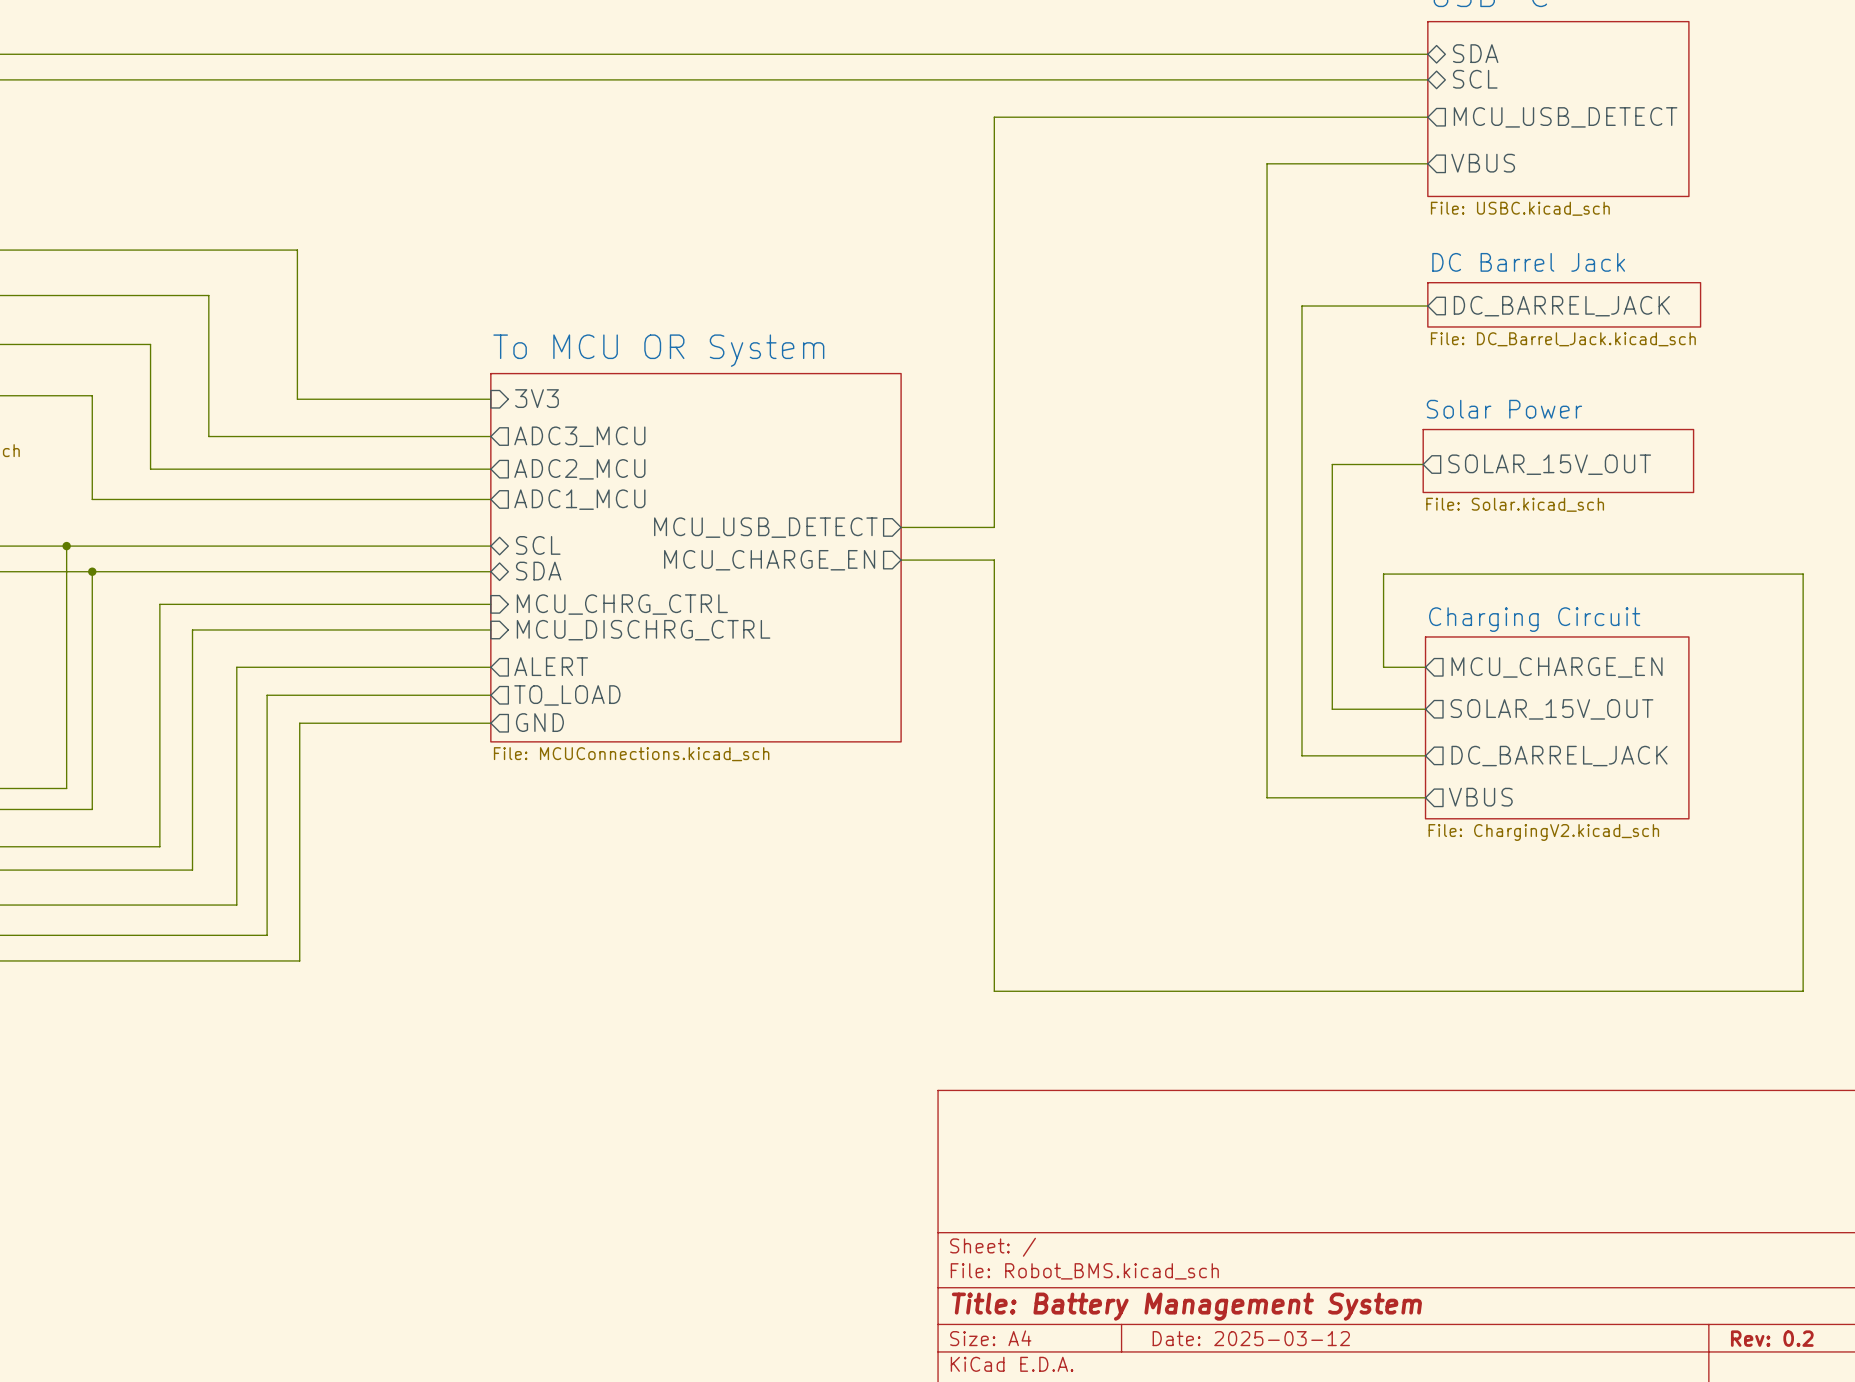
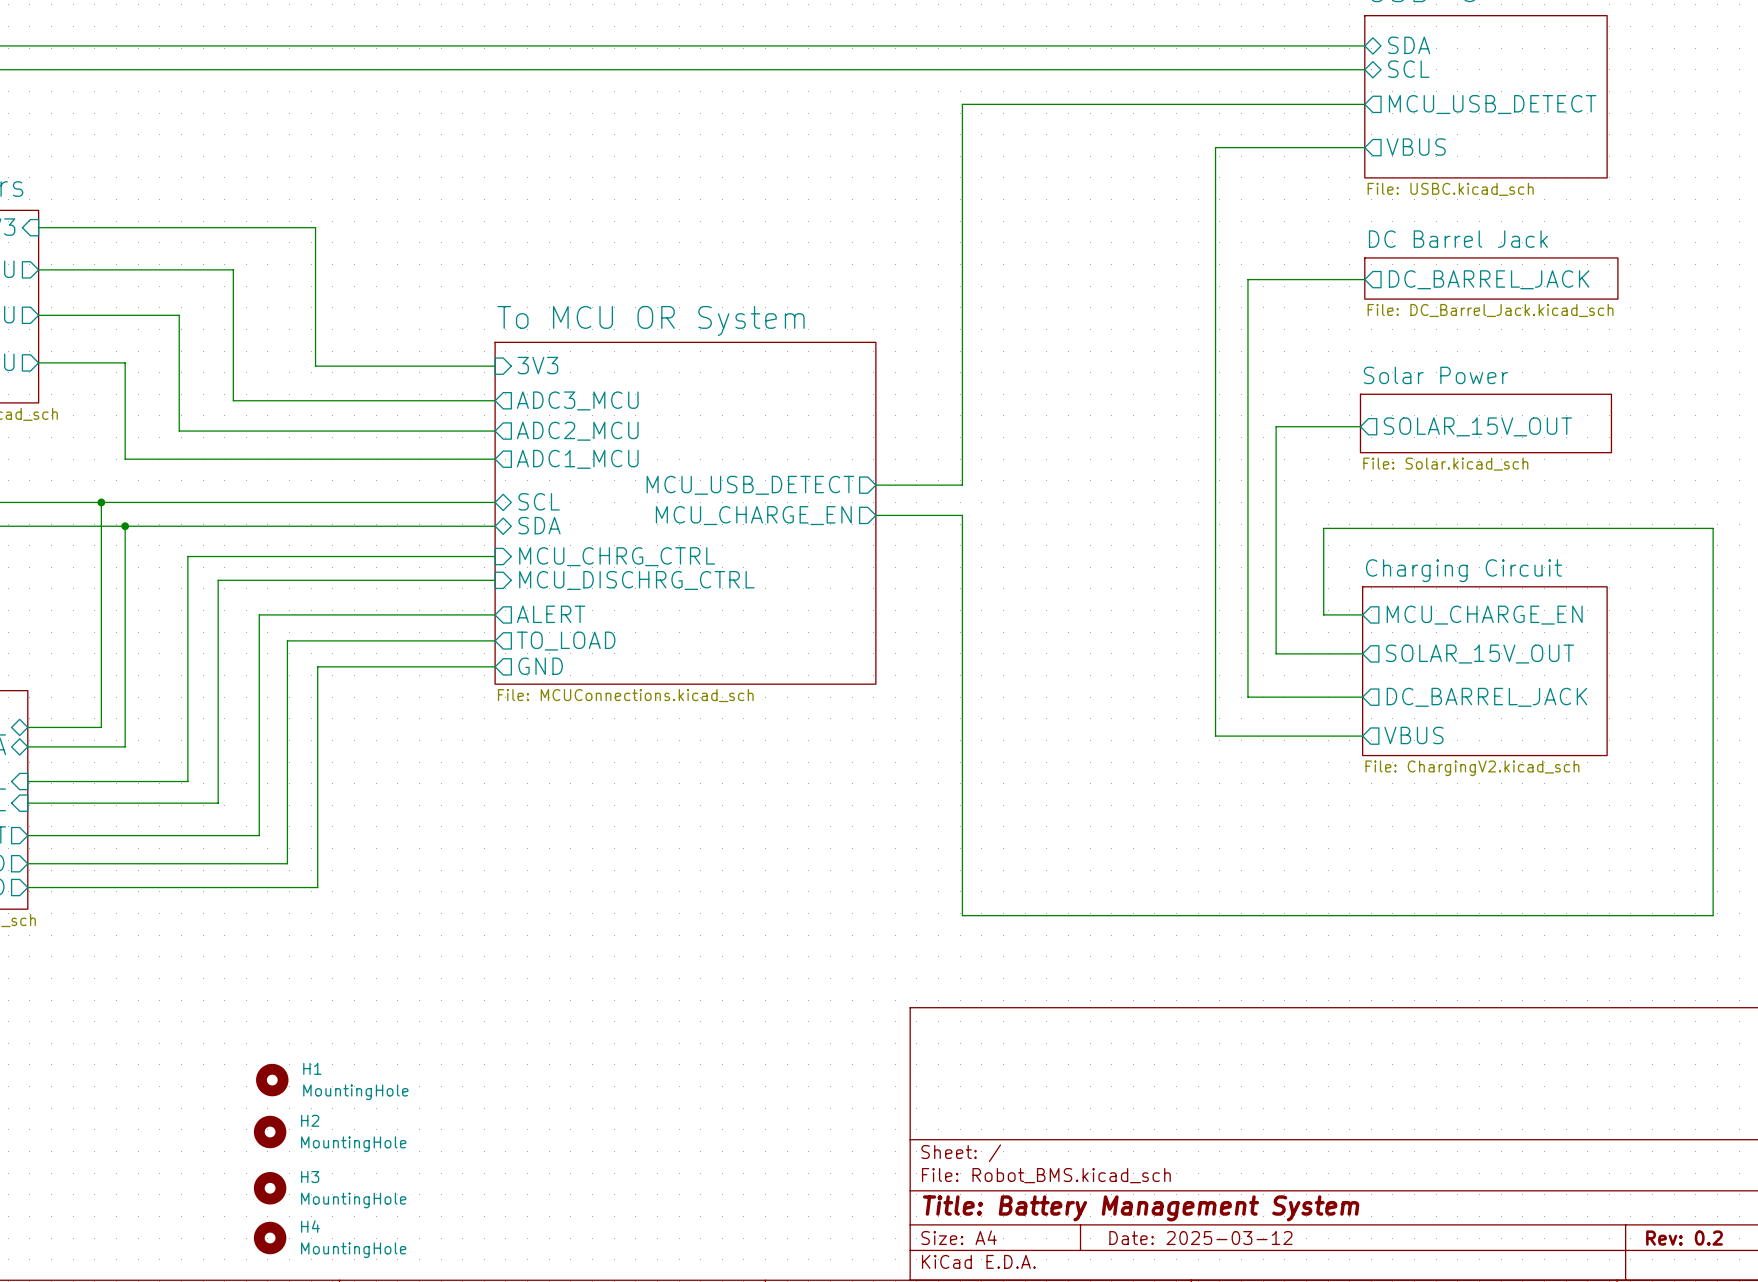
H1: none -> MountingHole (272, 1080)
H2: none -> MountingHole (270, 1132)
H3: none -> MountingHole (270, 1188)
H4: none -> MountingHole (270, 1238)

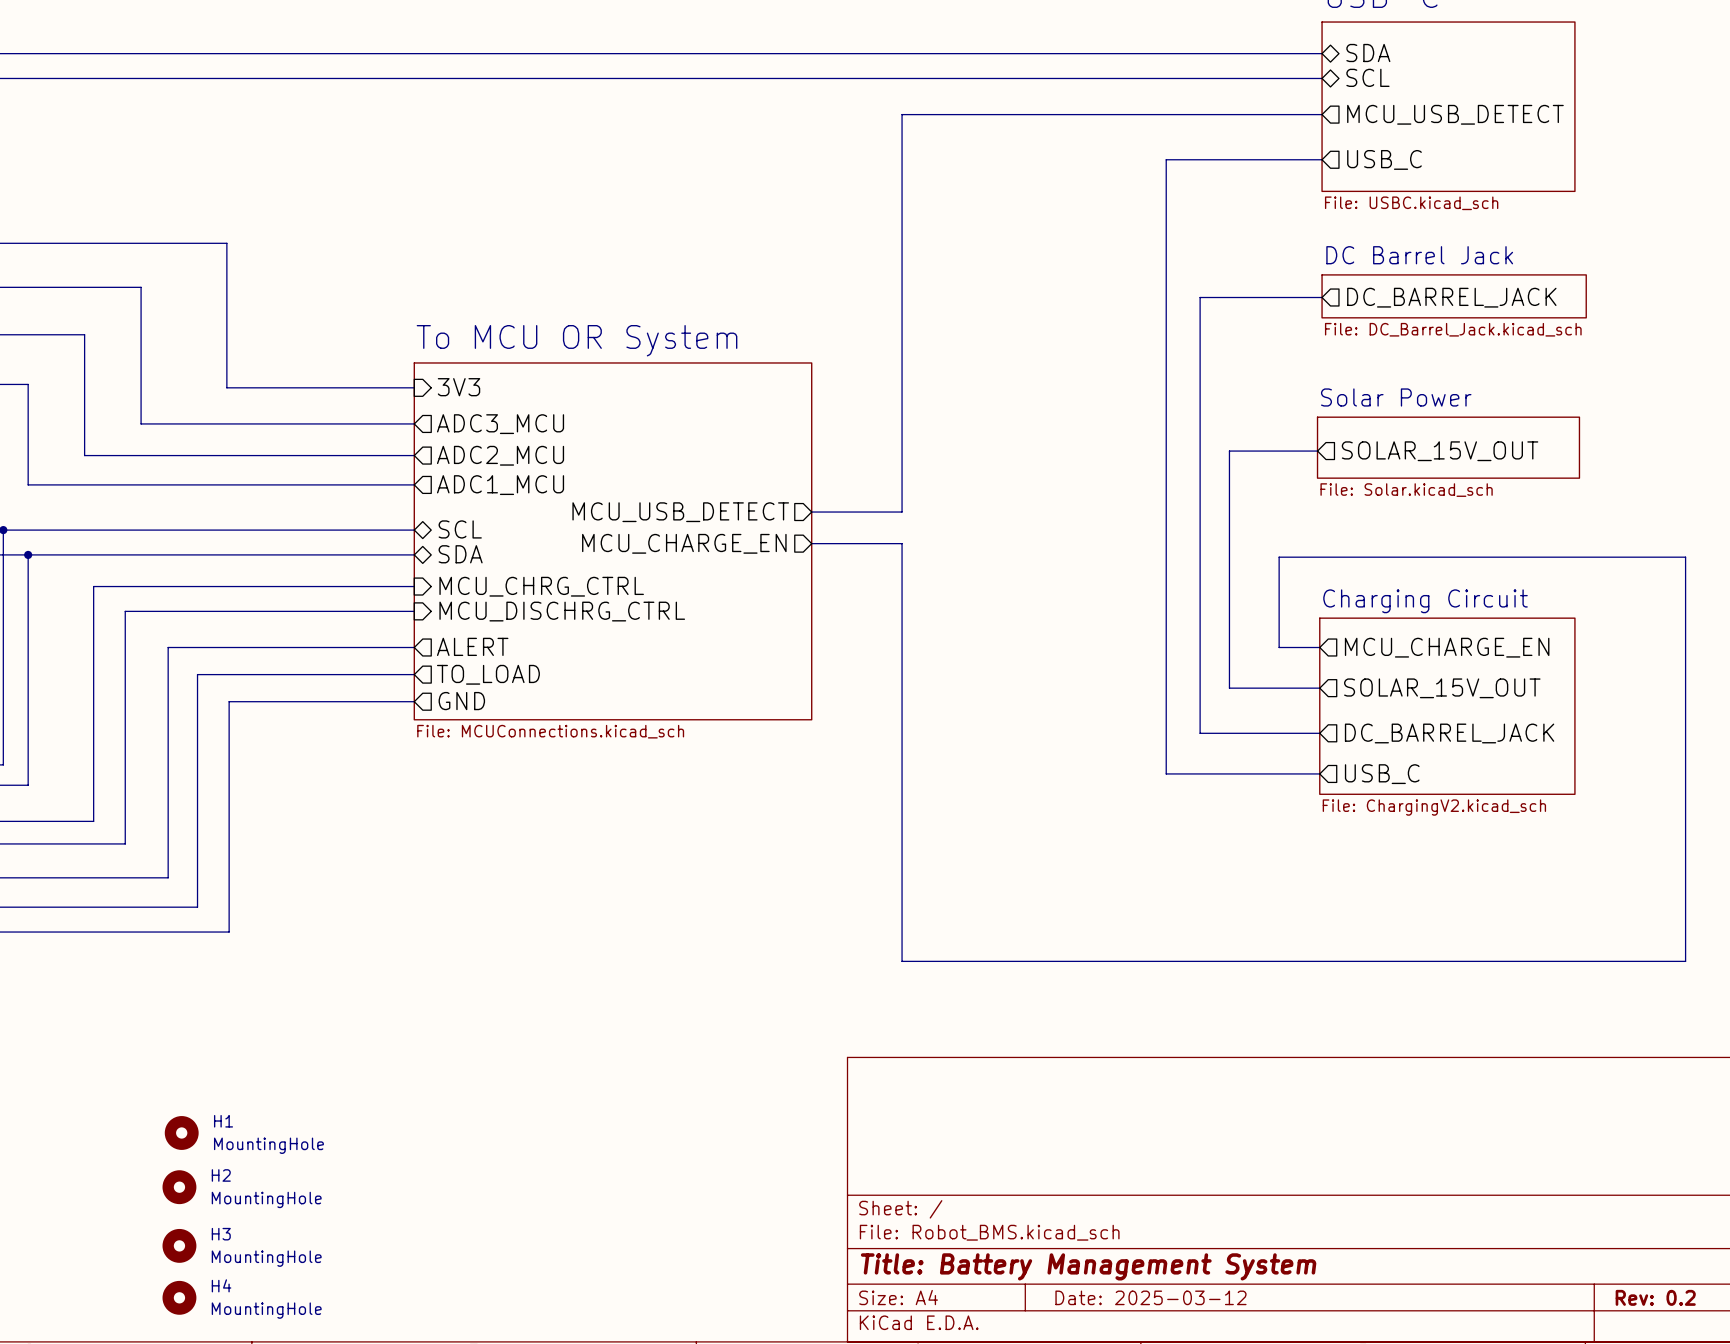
sheet pin: VBUS (1416, 147) -> USB_C (1384, 159)
sheet pin: VBUS (1413, 735) -> USB_C (1382, 774)

